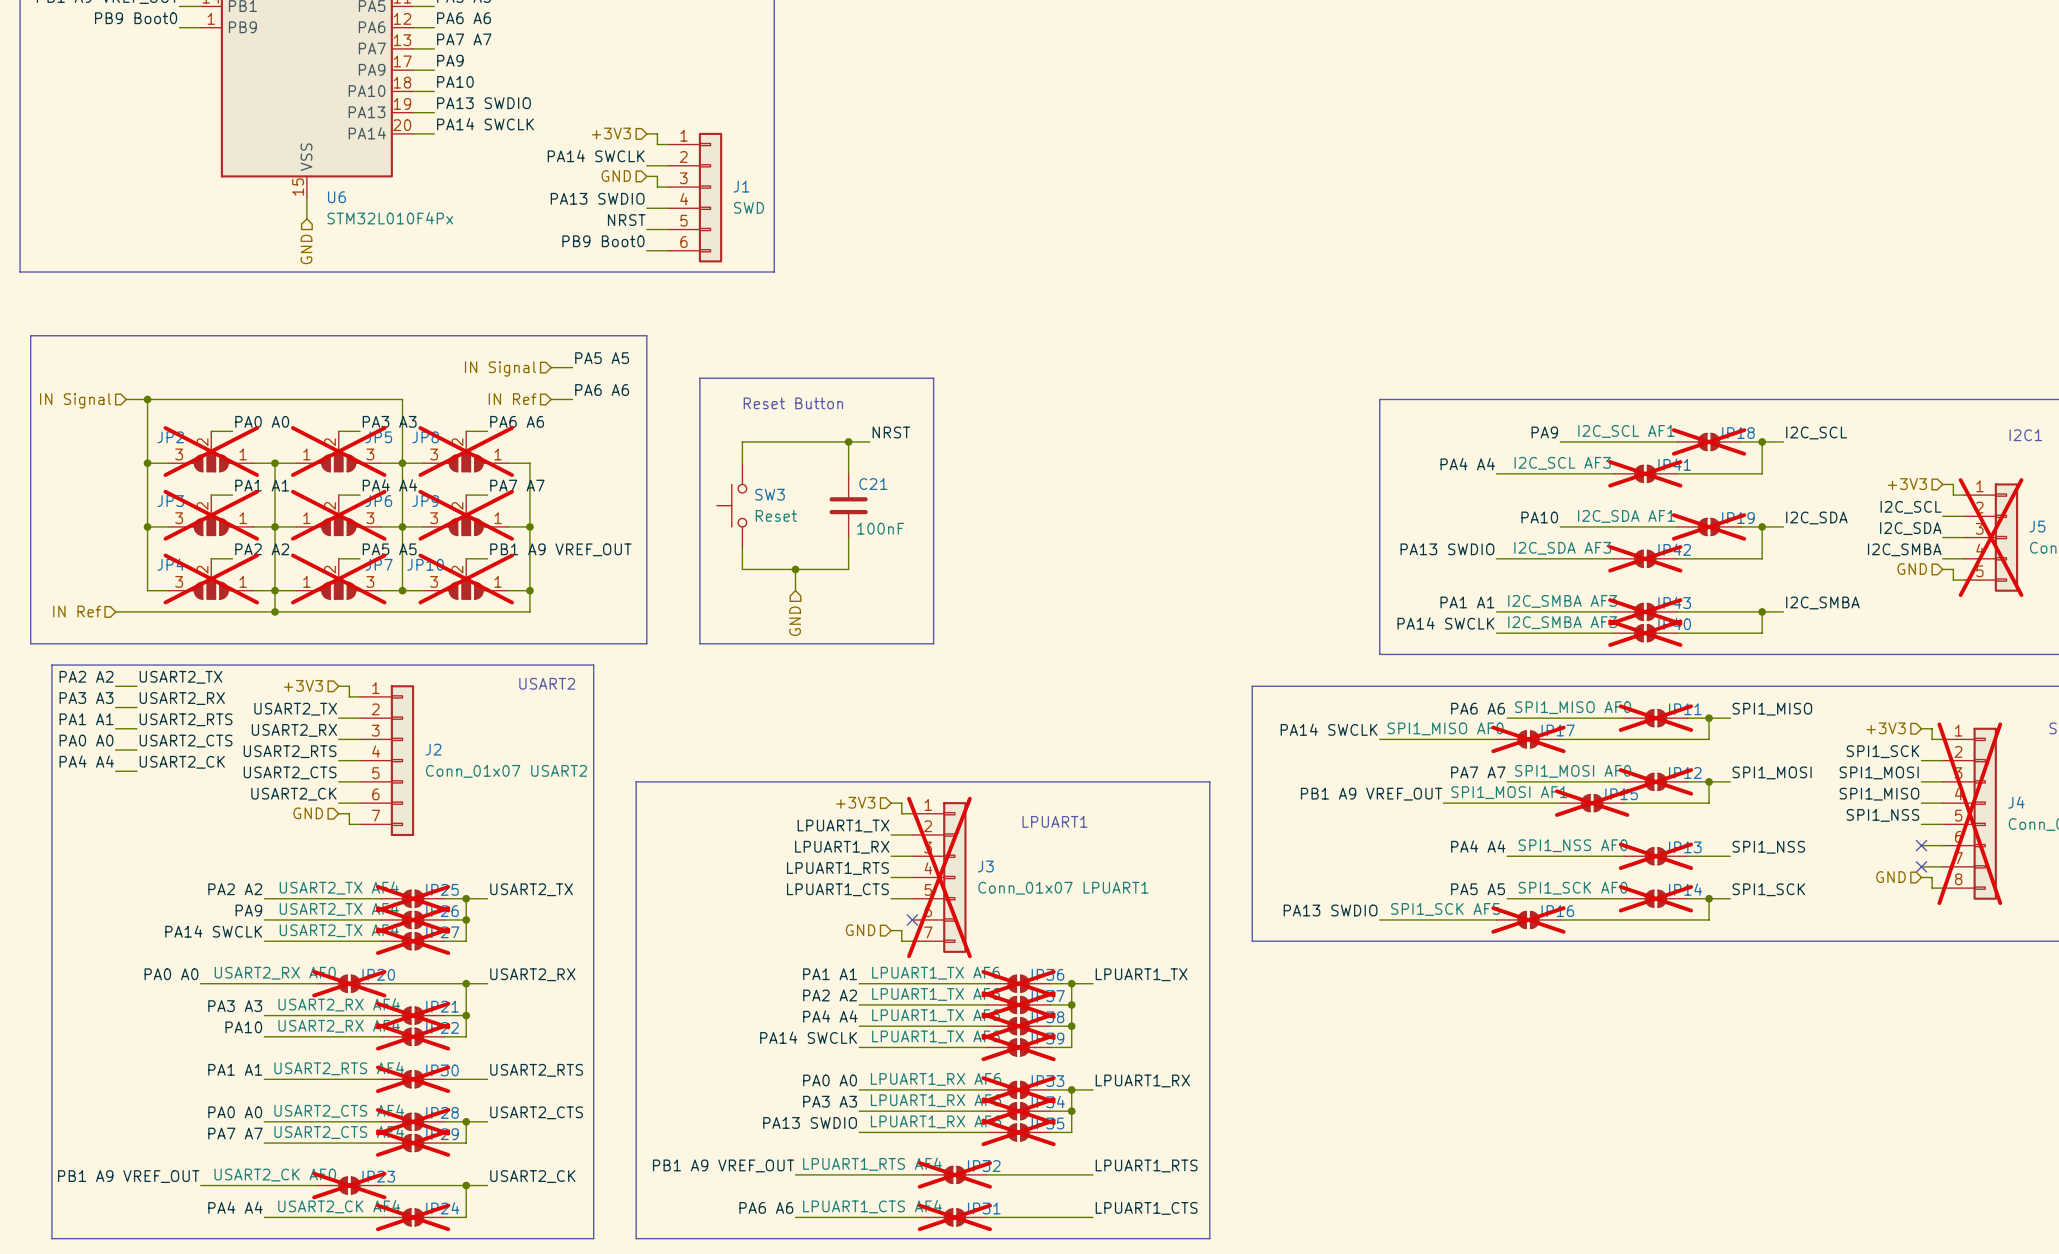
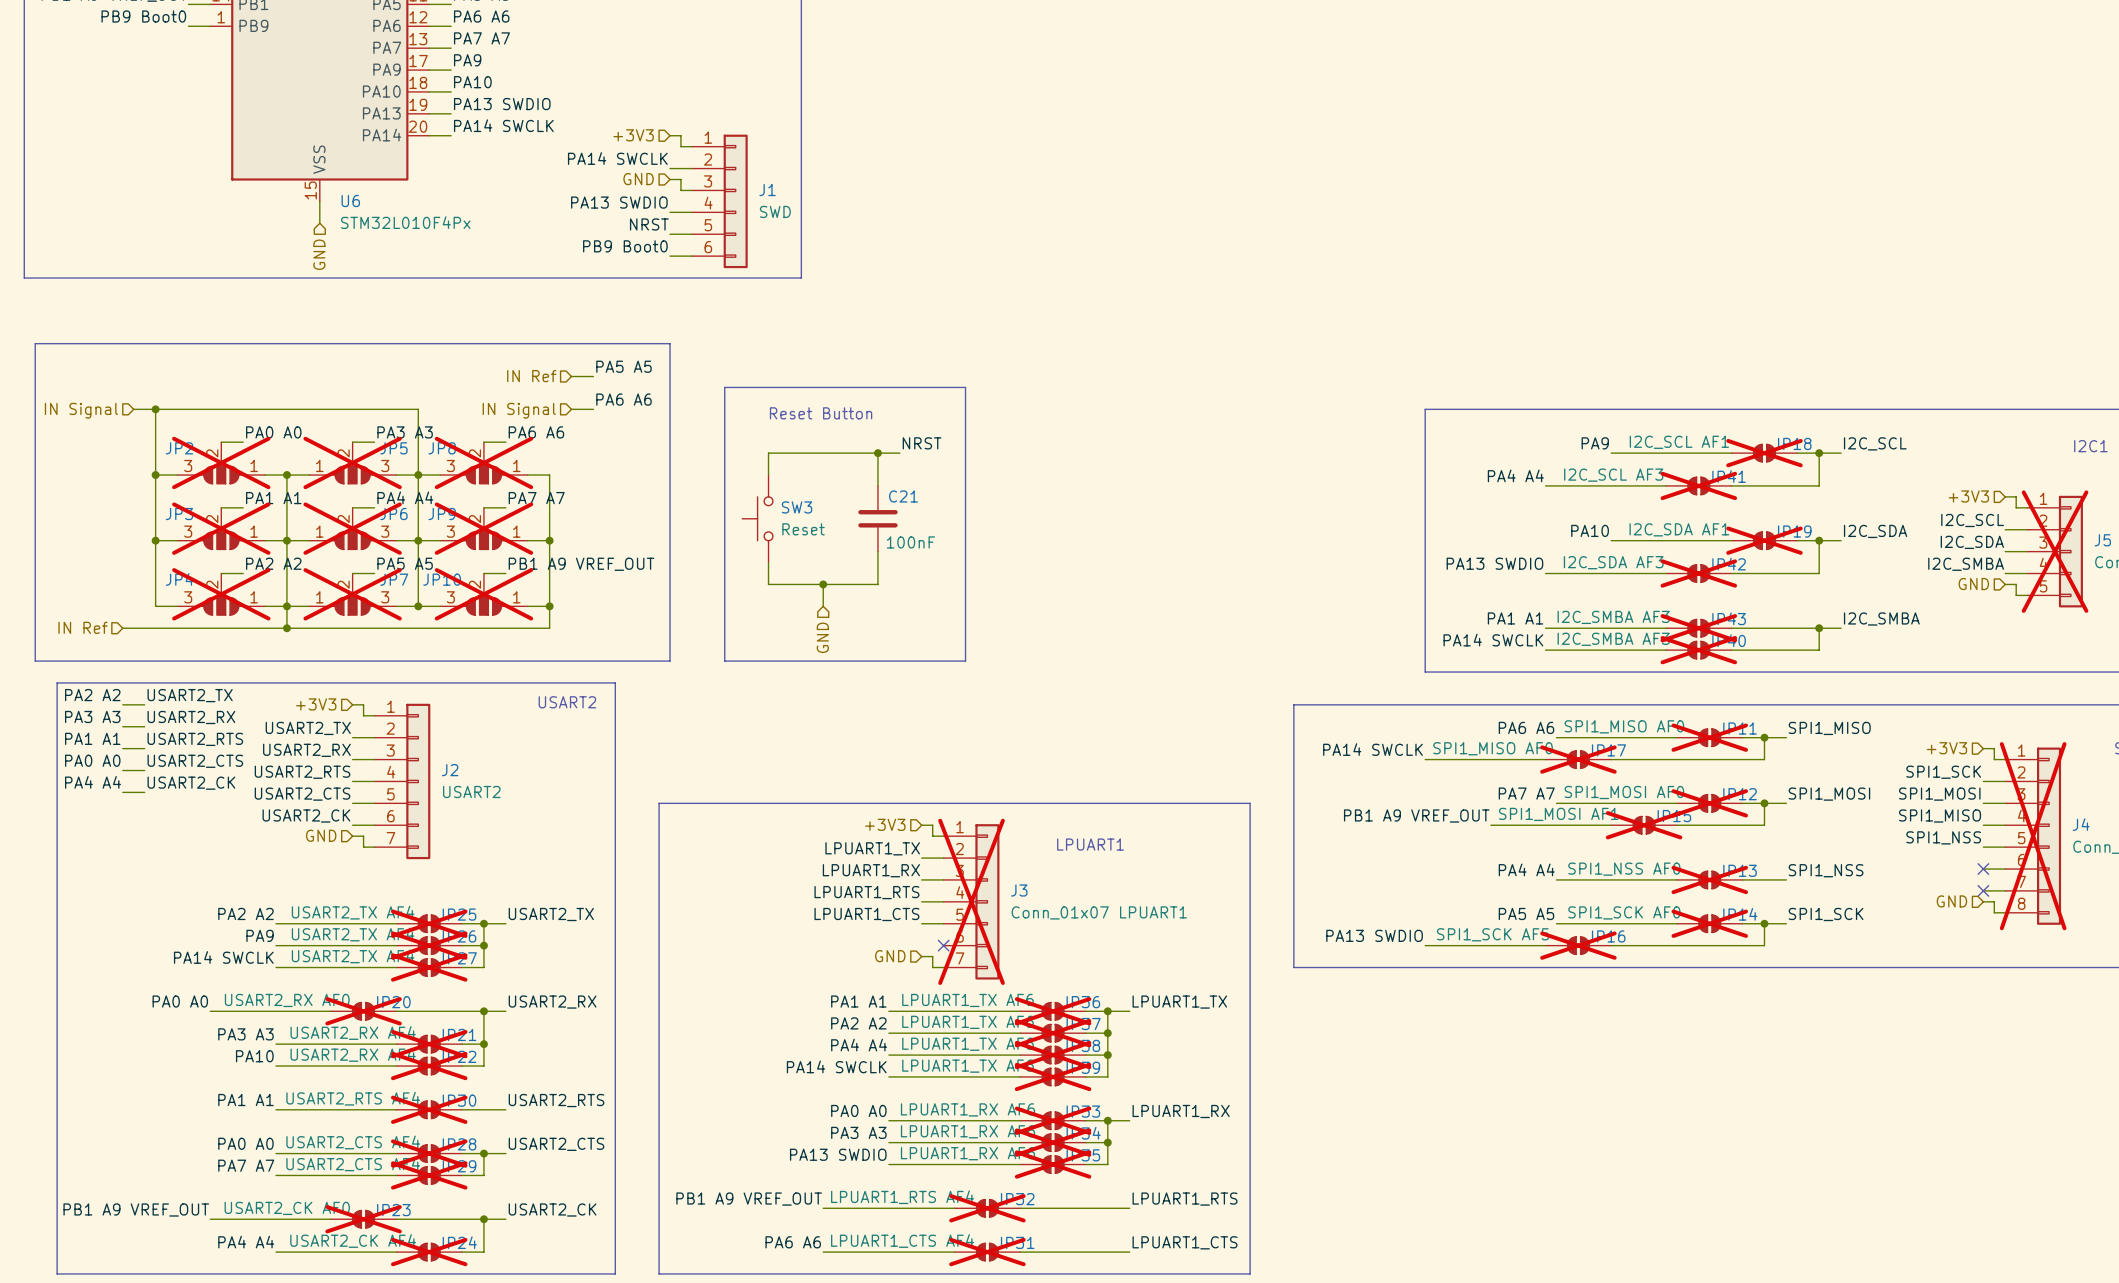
hierarchical label: IN Signal (500, 368) -> IN Ref (531, 376)
hierarchical label: IN Ref (512, 399) -> IN Signal (519, 410)
J2 value: Conn_01x07 USART2 (506, 771) -> USART2 (471, 791)

